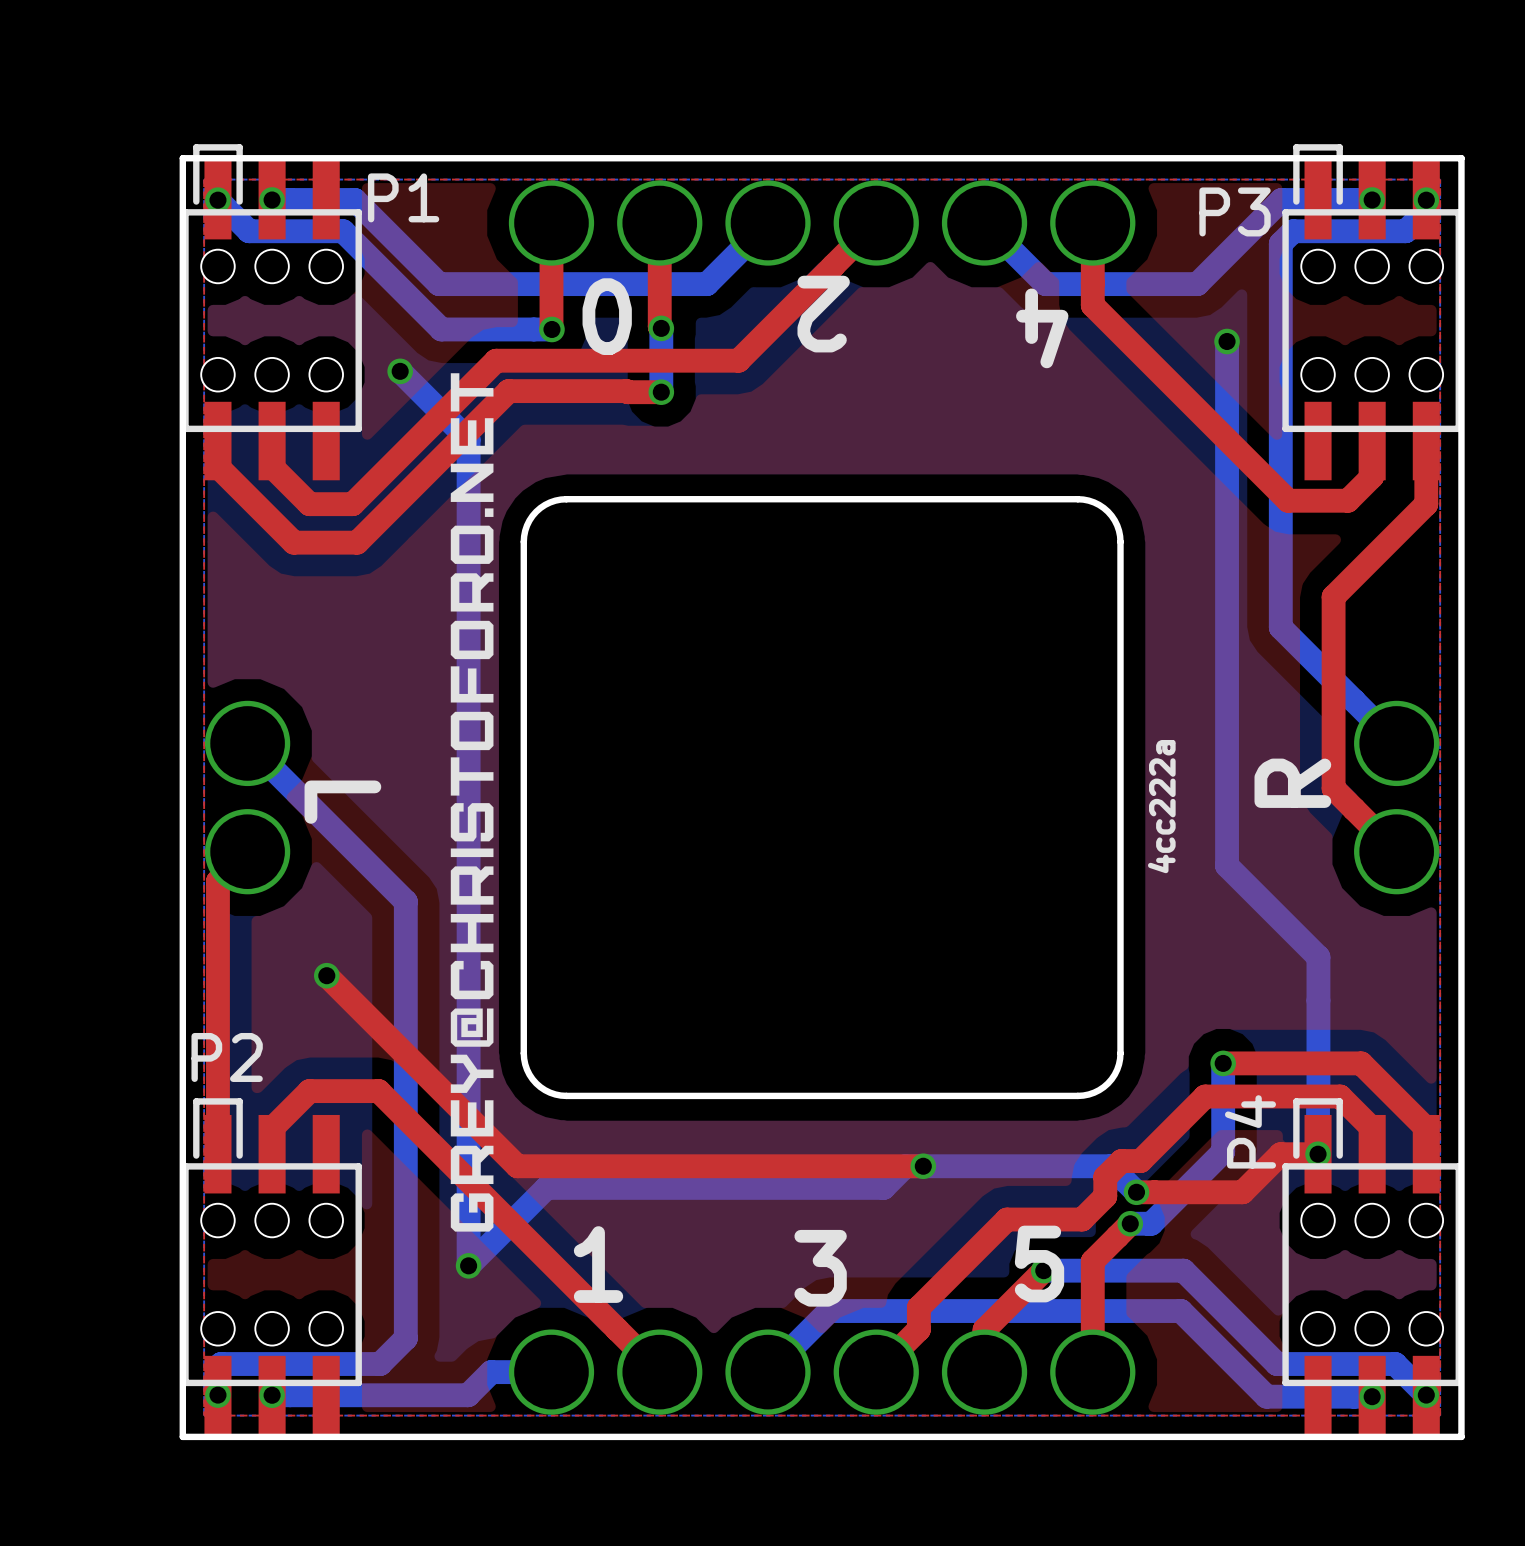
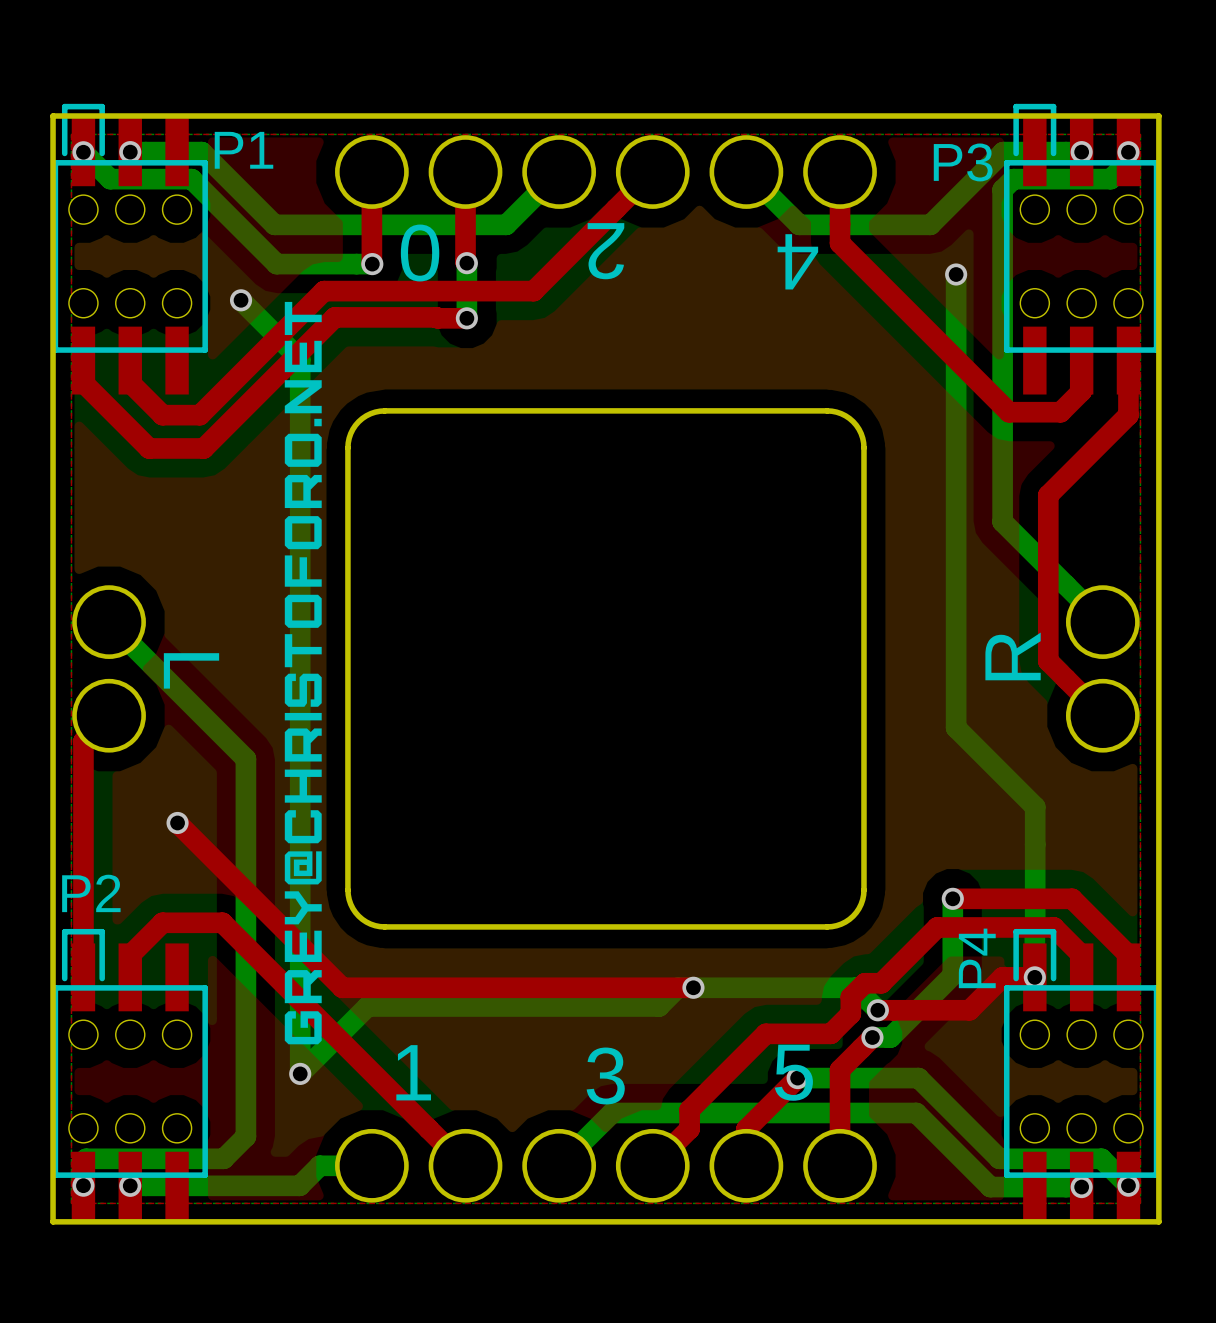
text: 4cc222a (1161, 806) -> none

